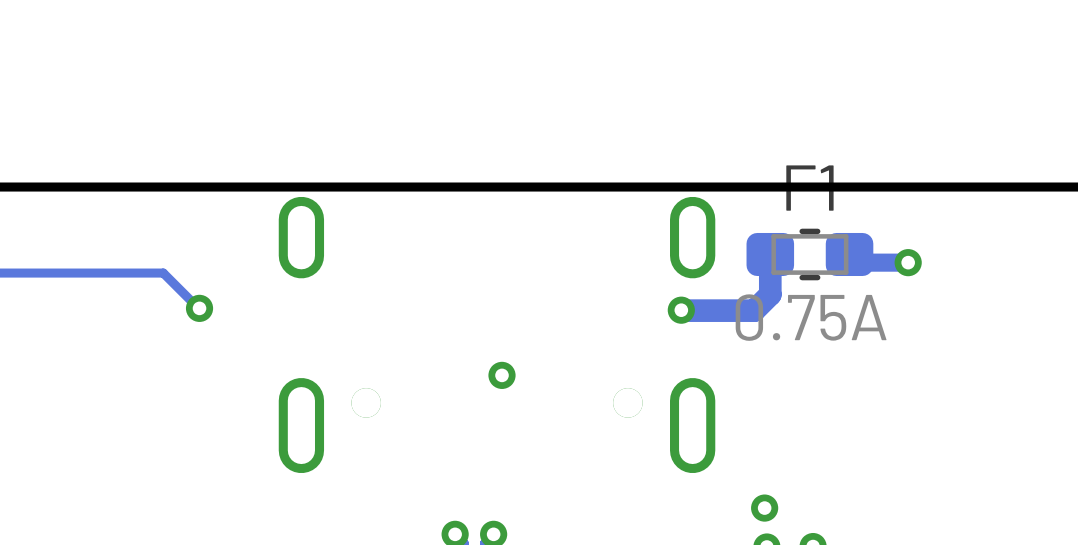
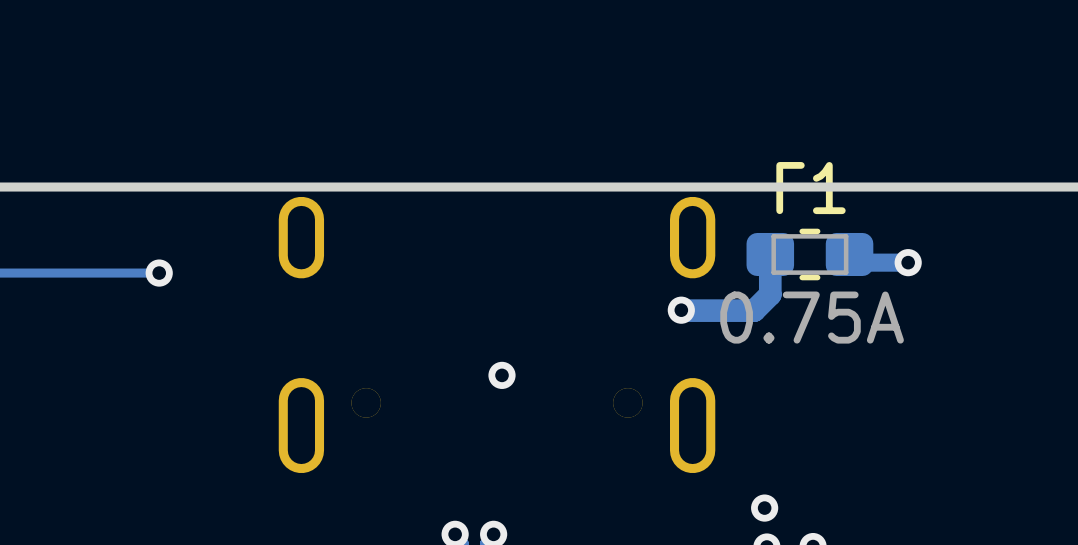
track: (159, 273) (163, 273) (198, 308) -> none
via position: (199, 308) -> (159, 273)

